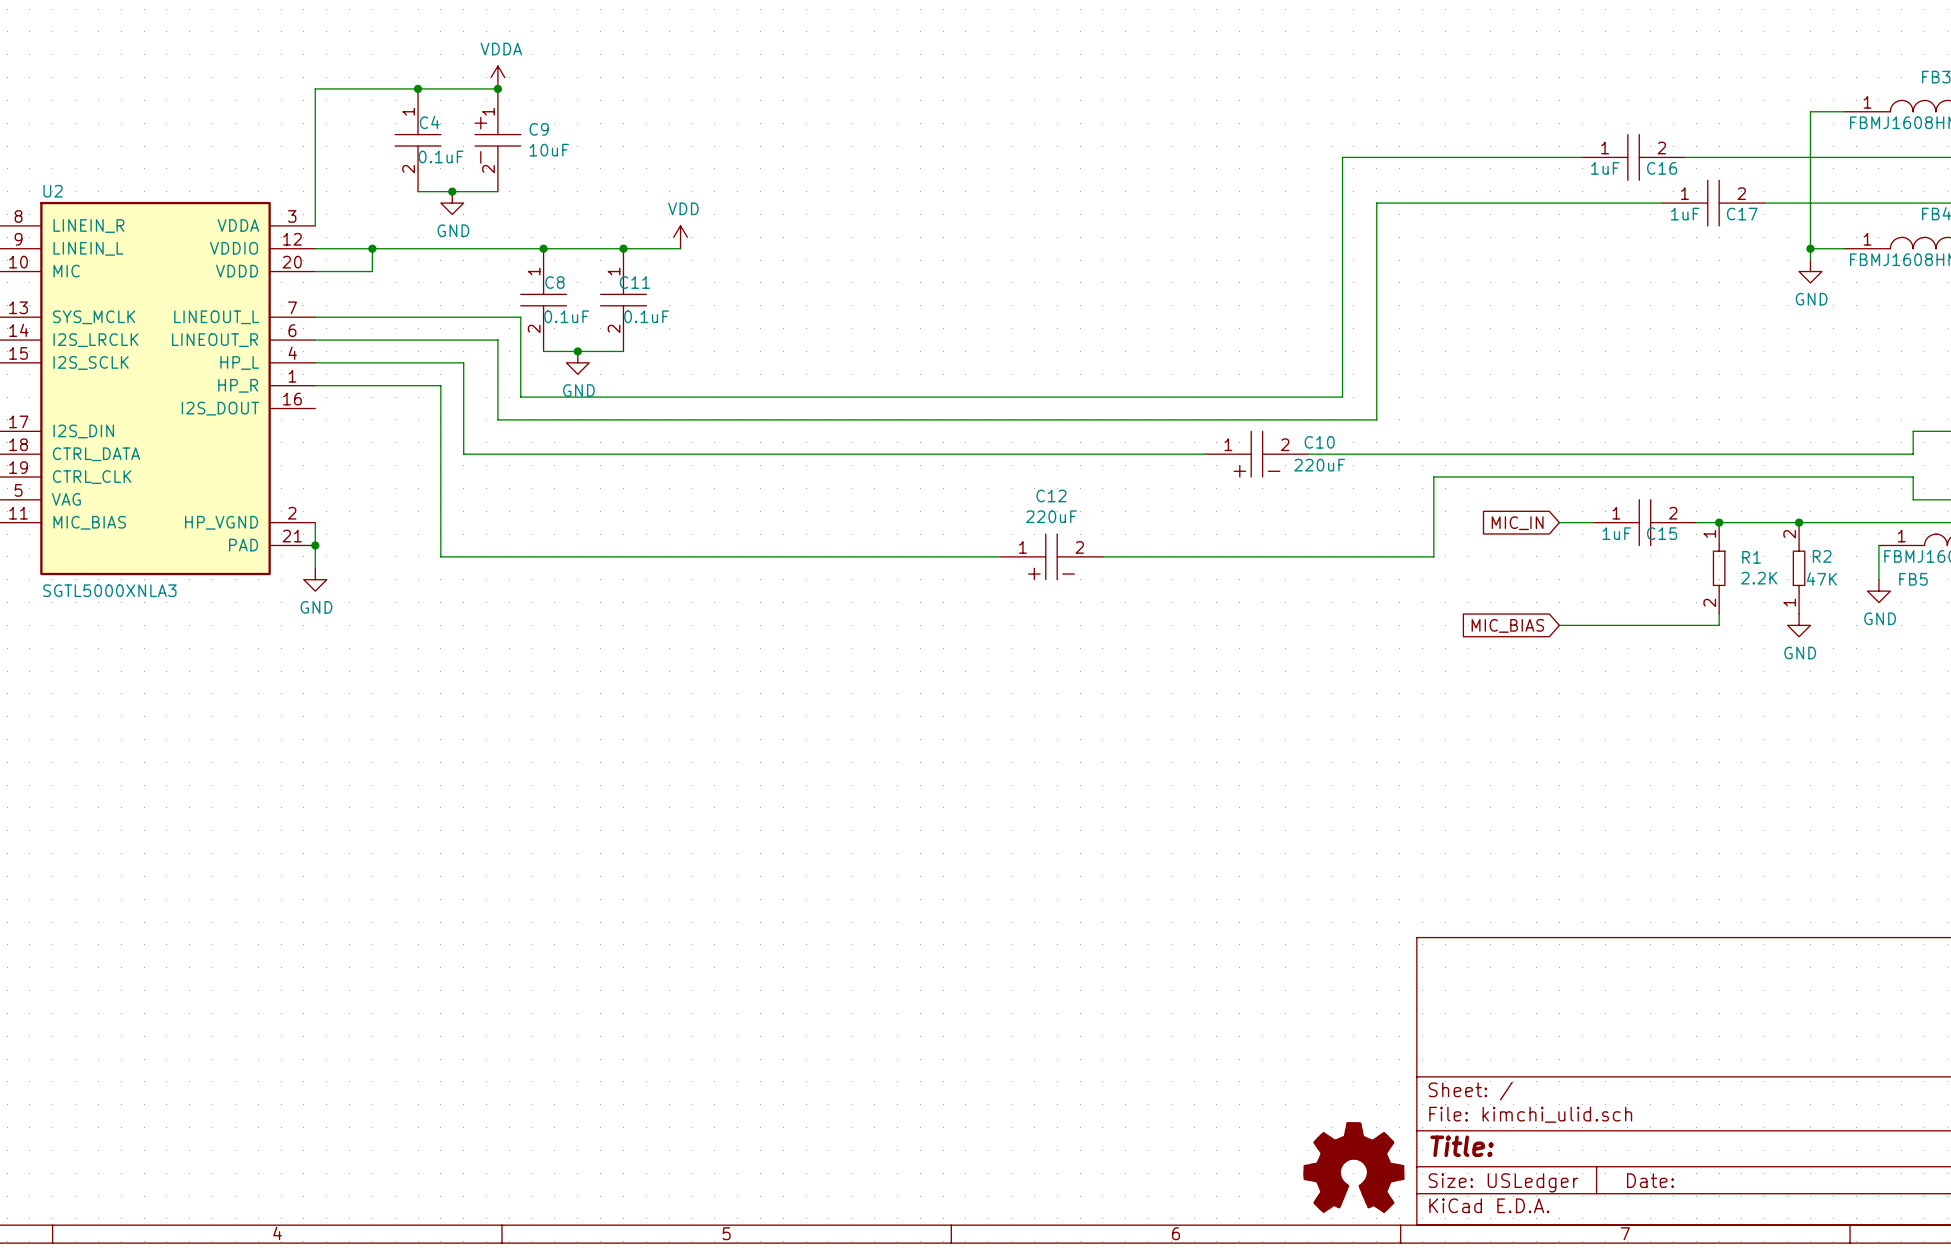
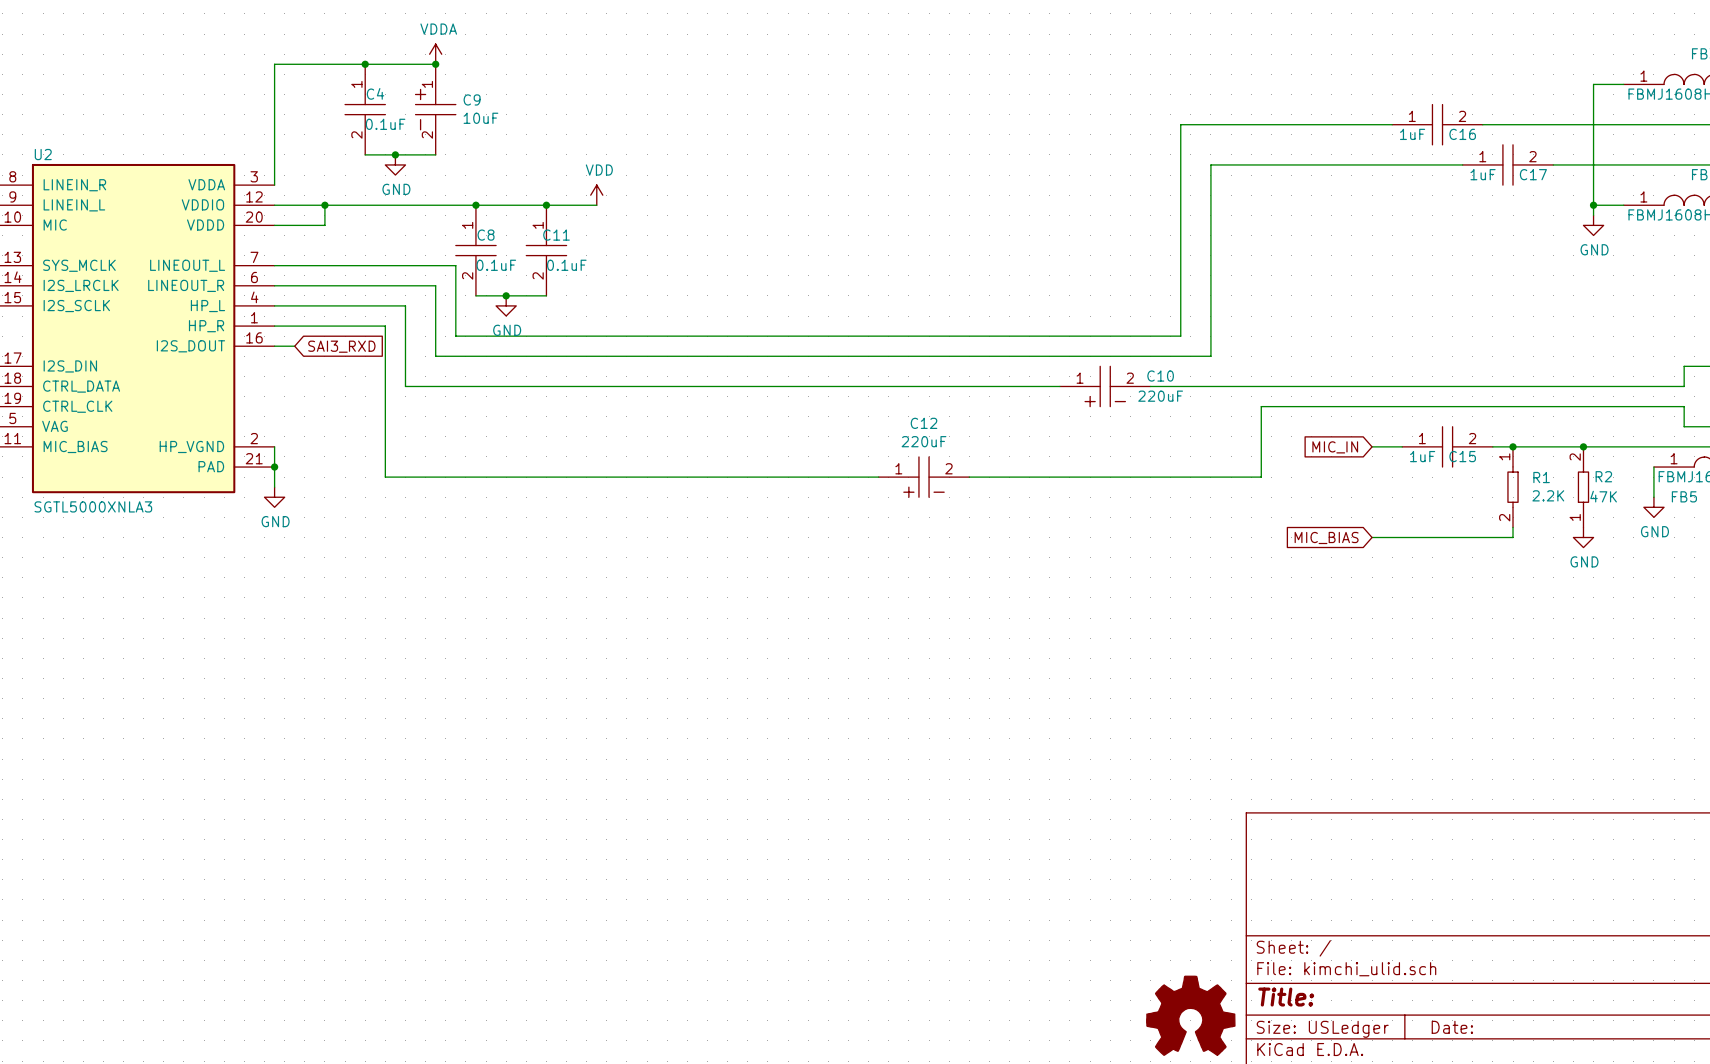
wire: none -> (274, 346) (294, 346)
global label: none -> SAI3_RXD (341, 346)

